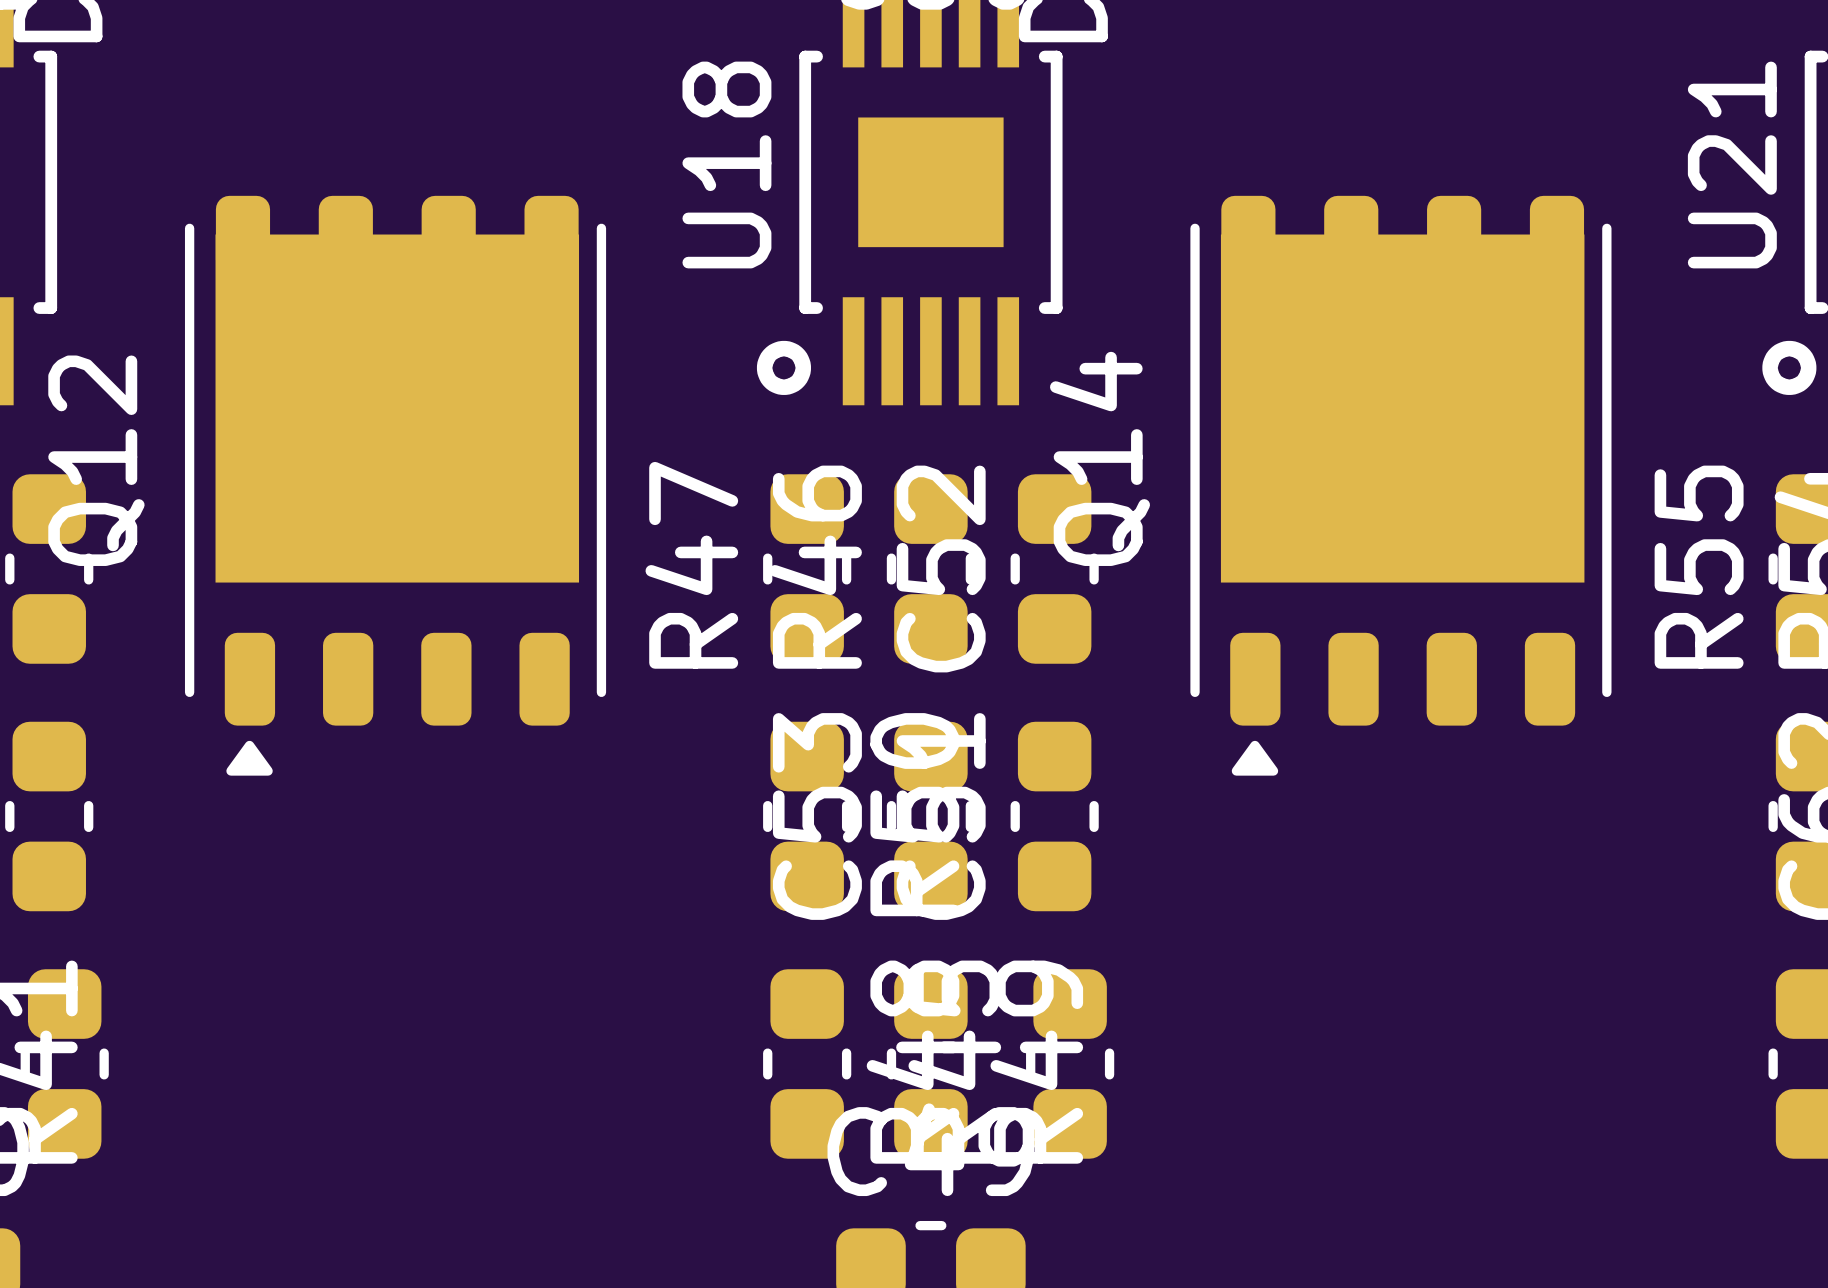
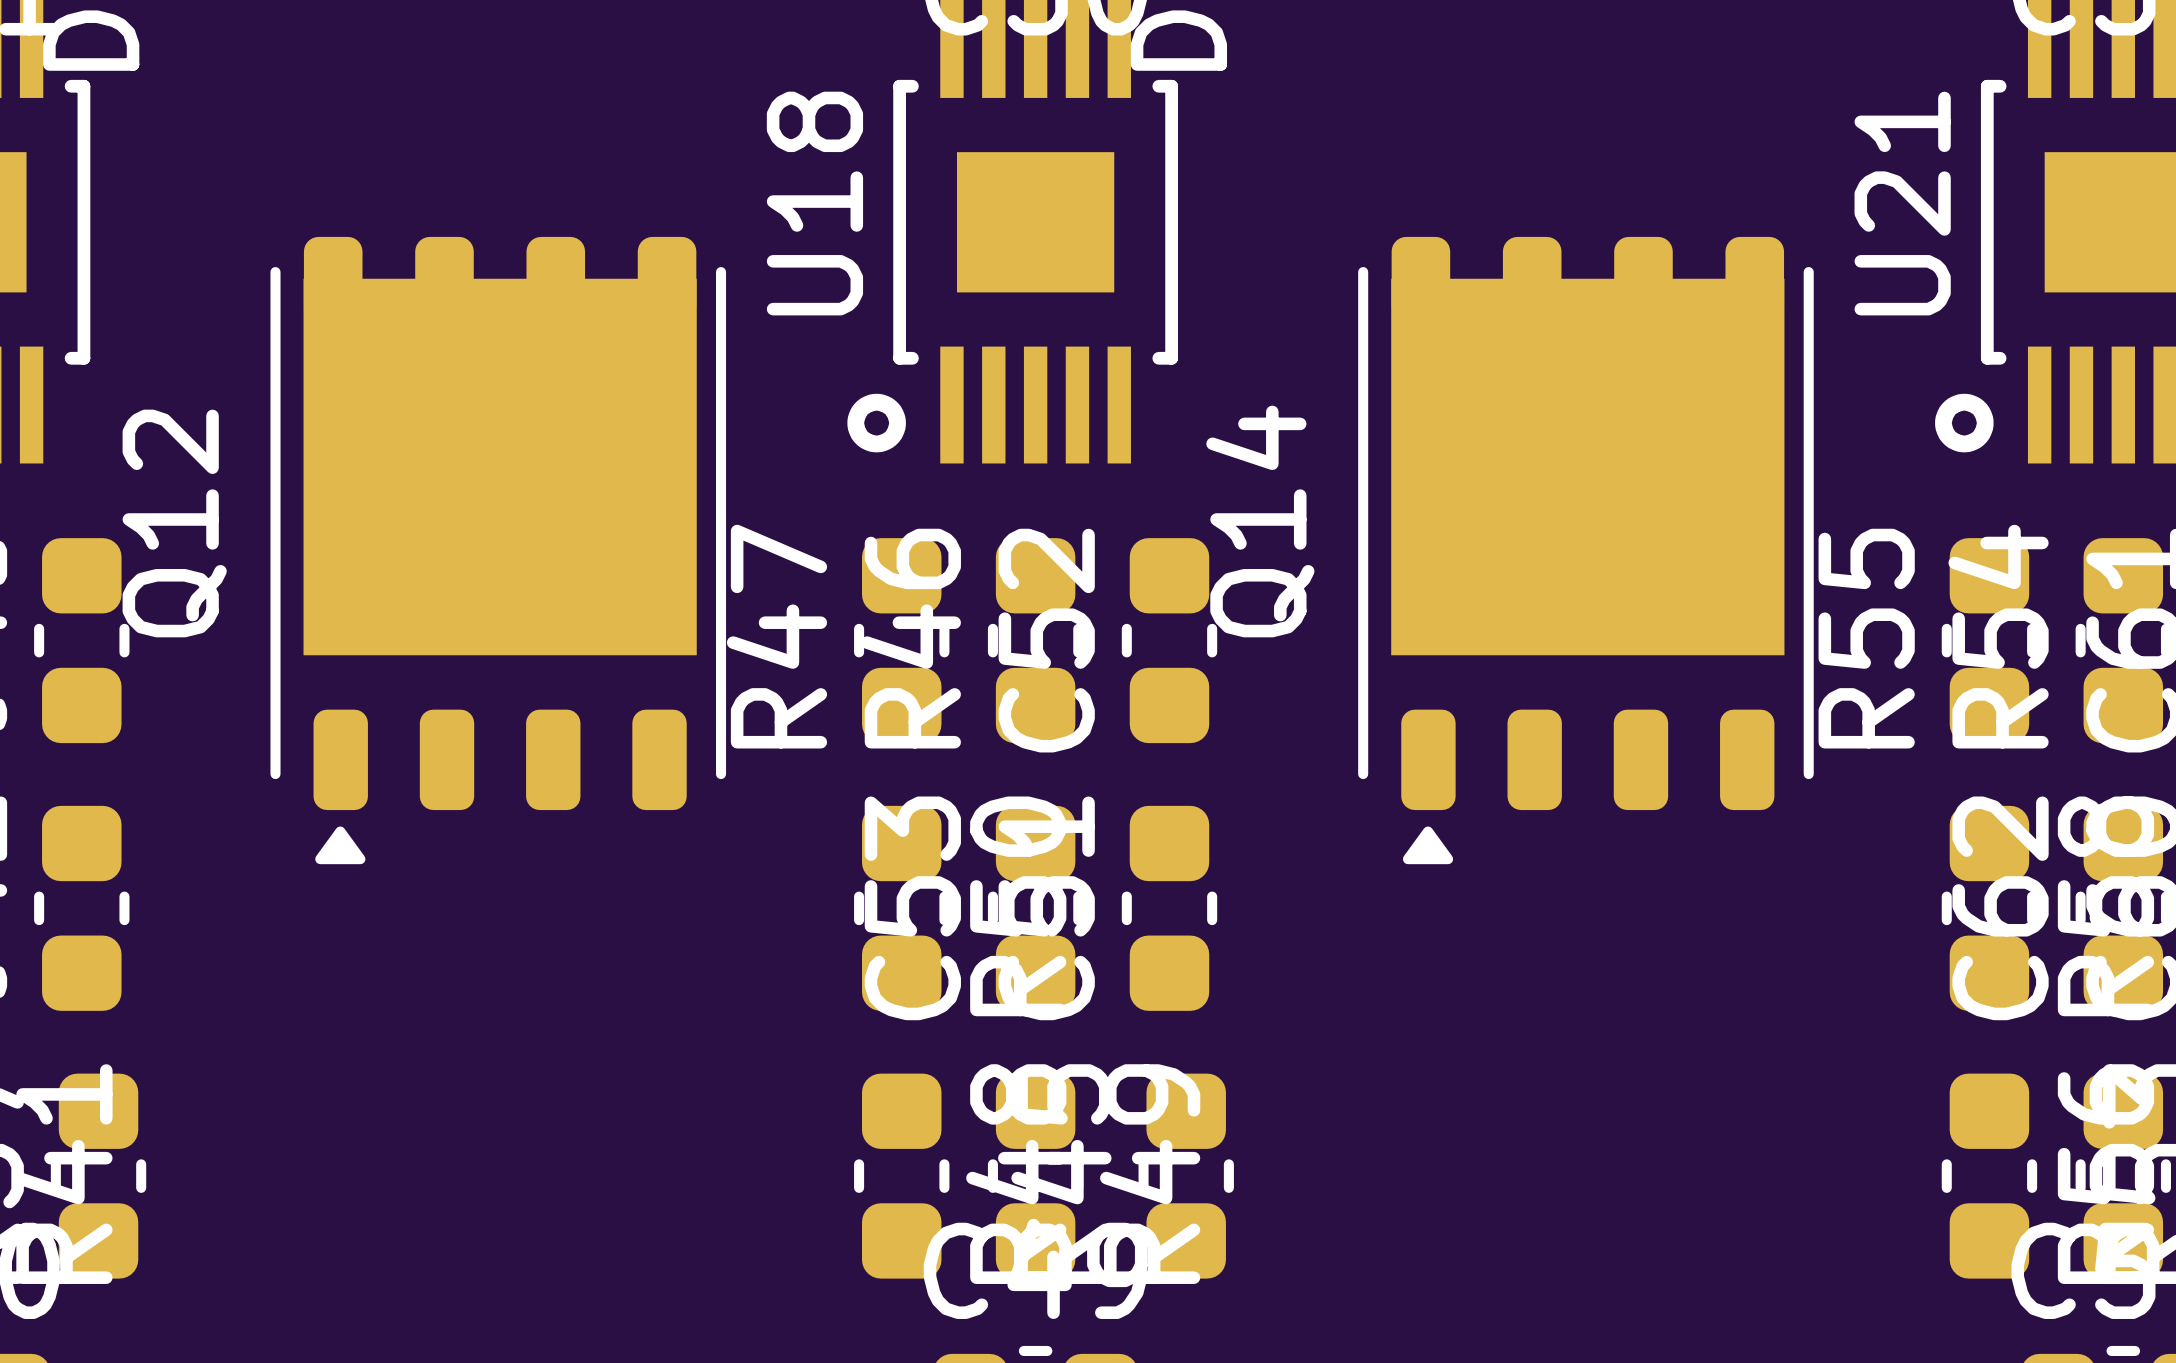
Q12 position: (395, 485) -> (498, 550)
Q14 position: (1400, 485) -> (1585, 550)

